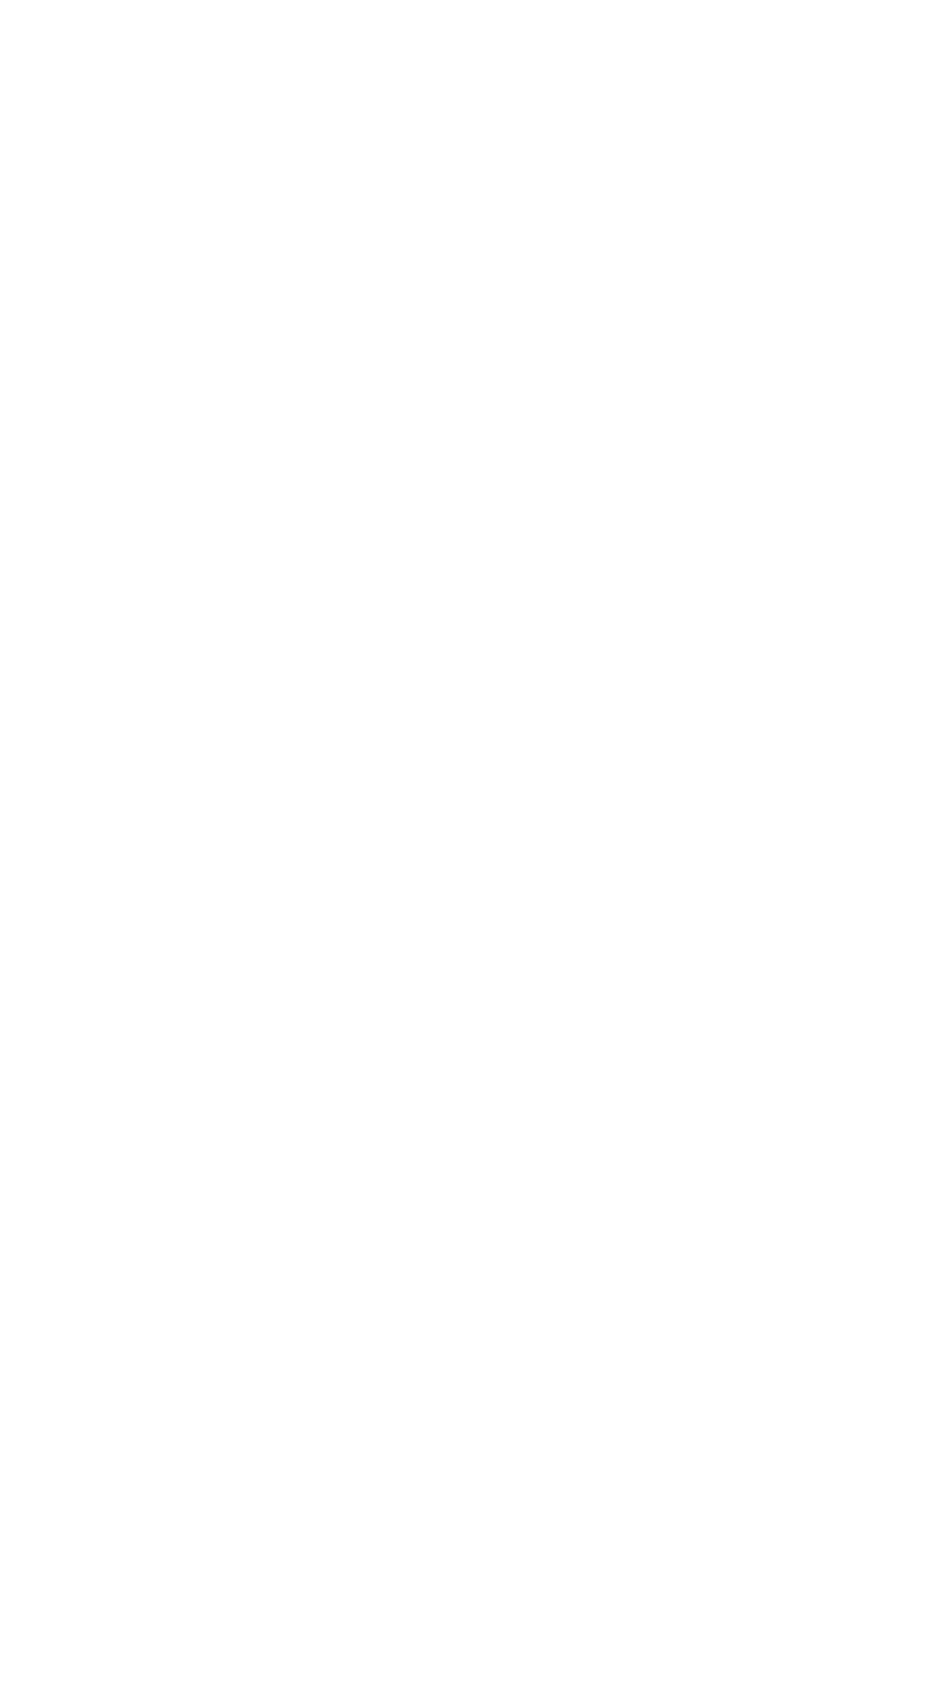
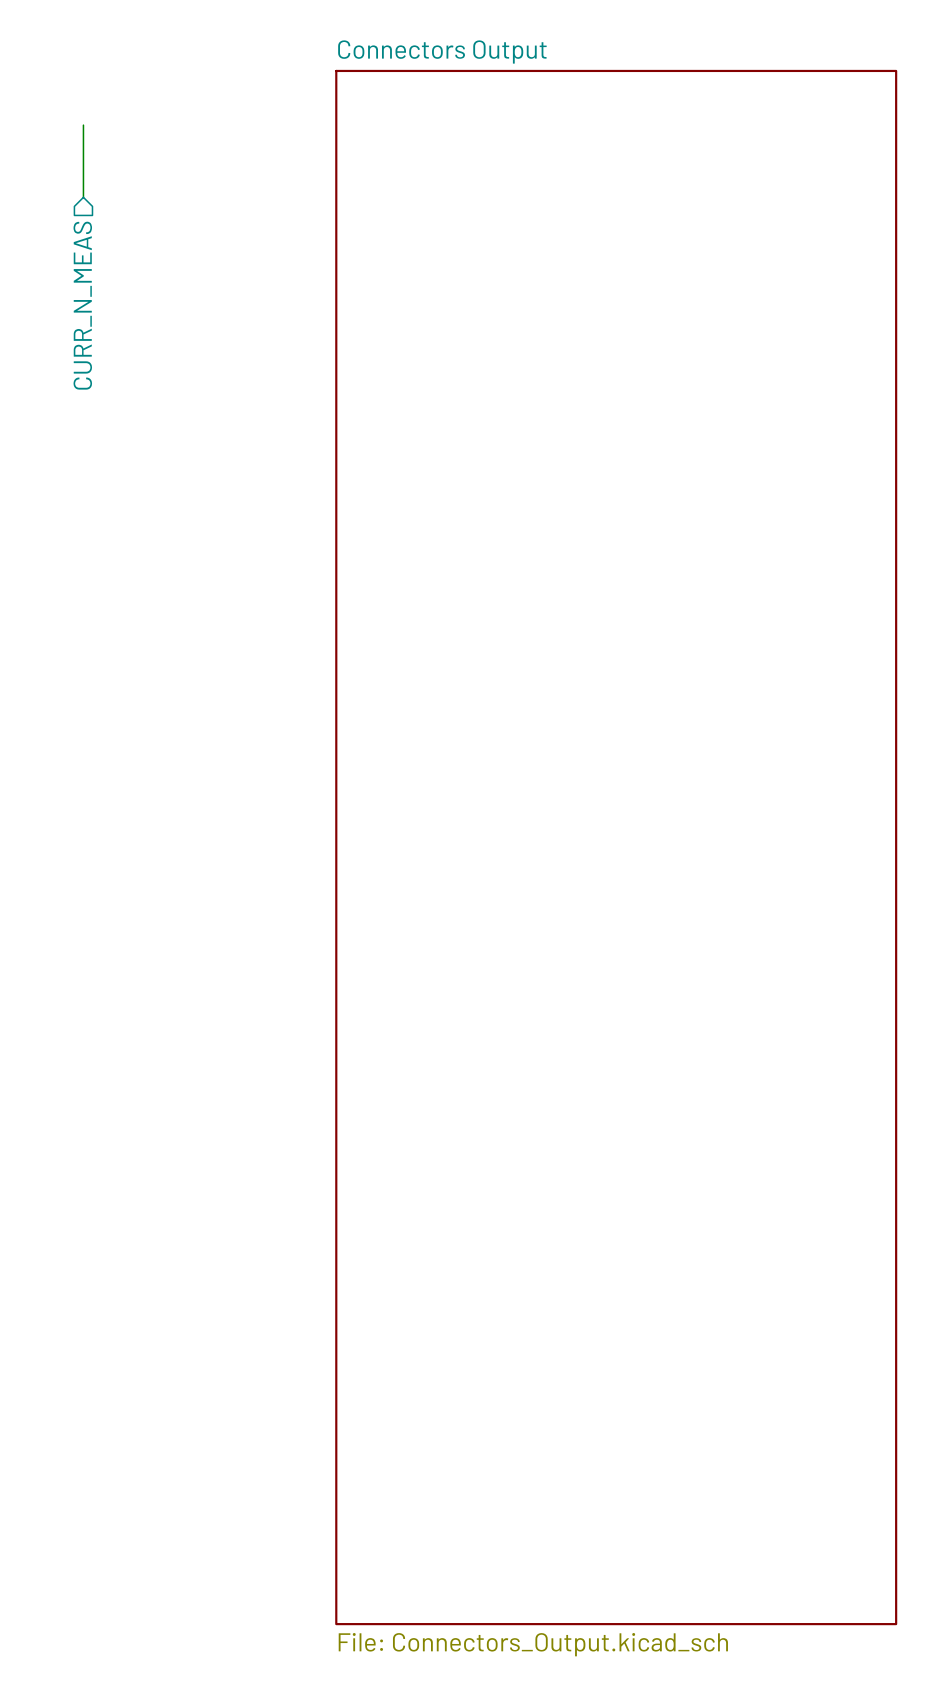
wire: none -> (83, 125) (83, 197)
sheet pin: none -> CURR_N_MEAS (82, 305)
sheet Connectors Output: none -> File: Connectors_Output.kicad_sch (616, 847)

